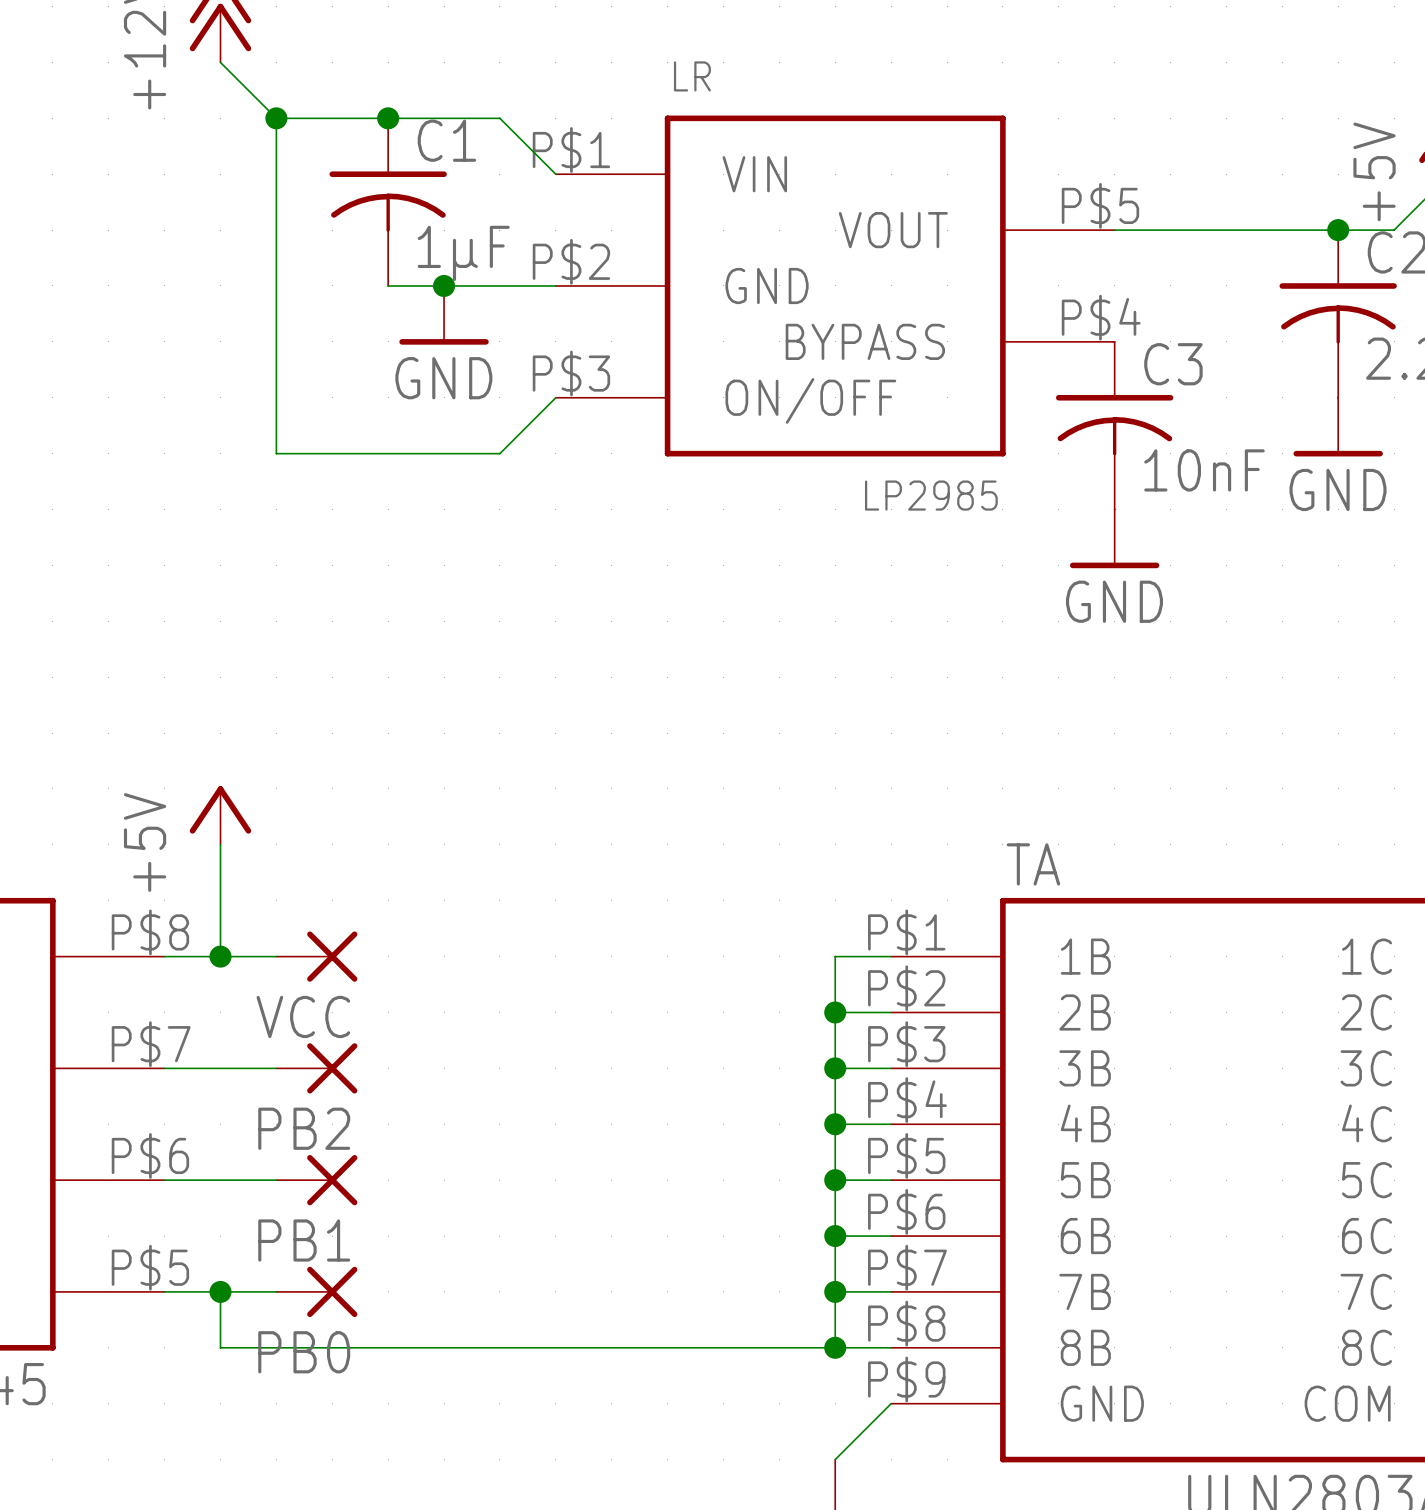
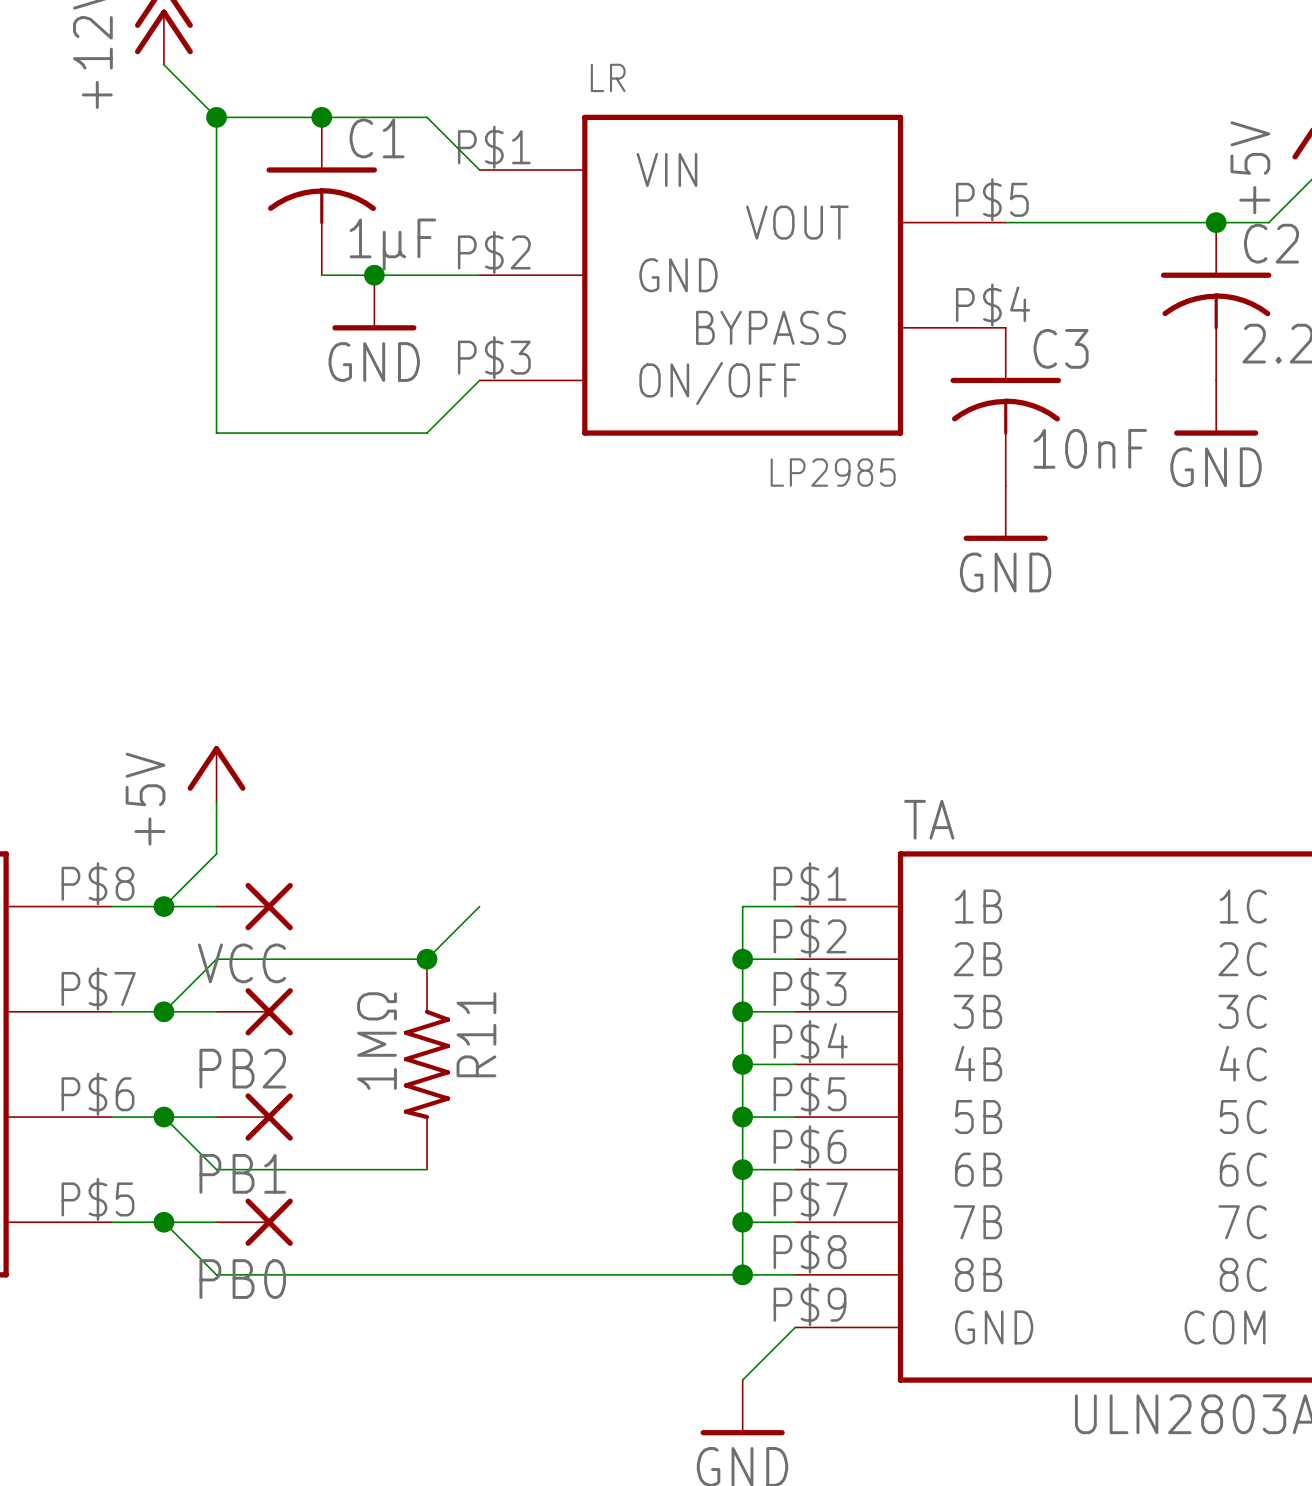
power symbol position: +5V (220, 815) -> +5V (216, 773)
wire: (220, 844) (220, 956) -> (216, 801) (216, 853) (163, 906)
wire: none -> (479, 906) (426, 959) (216, 959) (163, 1011)
junction: none -> (426, 959)
junction: none -> (163, 1011)
R11: none -> 1MΩ (426, 1064)
wire: none -> (163, 1117) (216, 1169) (426, 1169)
junction: none -> (163, 1117)
wire: (220, 1291) (220, 1347) (276, 1347) -> (163, 1222) (216, 1274)

